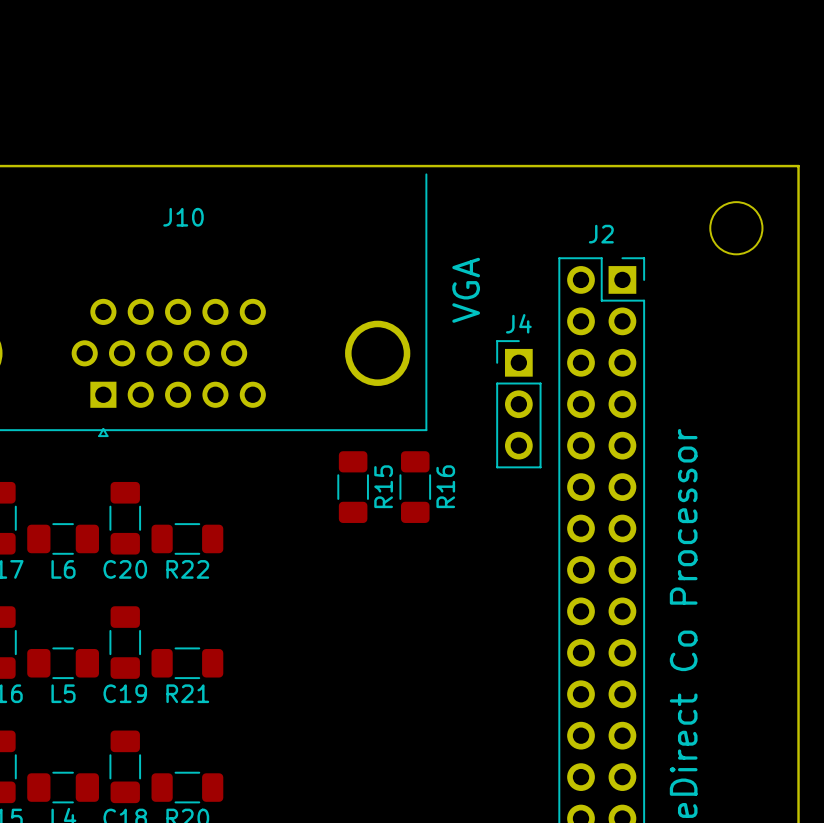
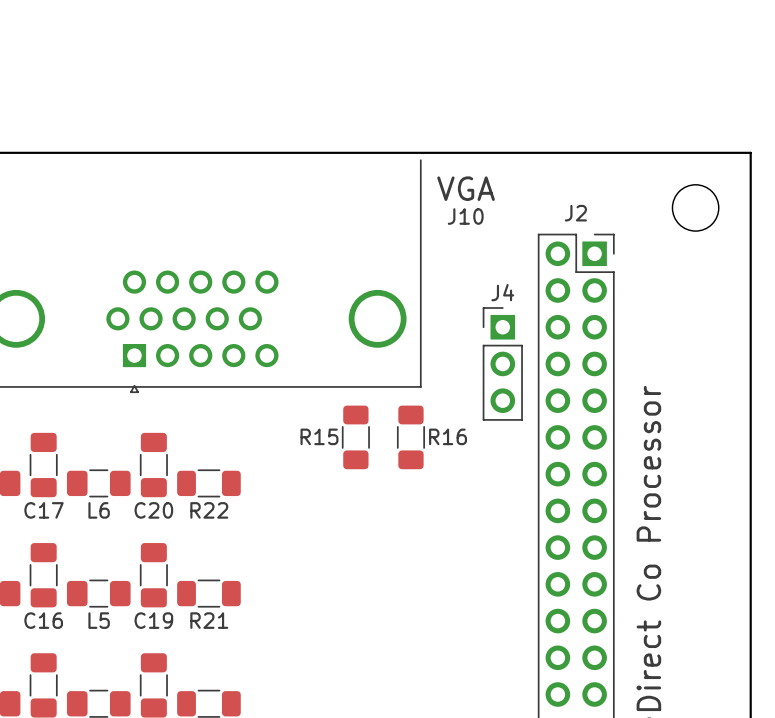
J10 name position: J10 (183, 217) -> J10 (465, 216)
text rotation: 0° (466, 290) -> 90° clockwise (466, 188)
R15 name rotation: 0° (383, 486) -> 90° clockwise (319, 436)
R15 name position: R15 (383, 486) -> R15 (319, 436)
R16 name rotation: 0° (445, 486) -> 90° clockwise (448, 436)

